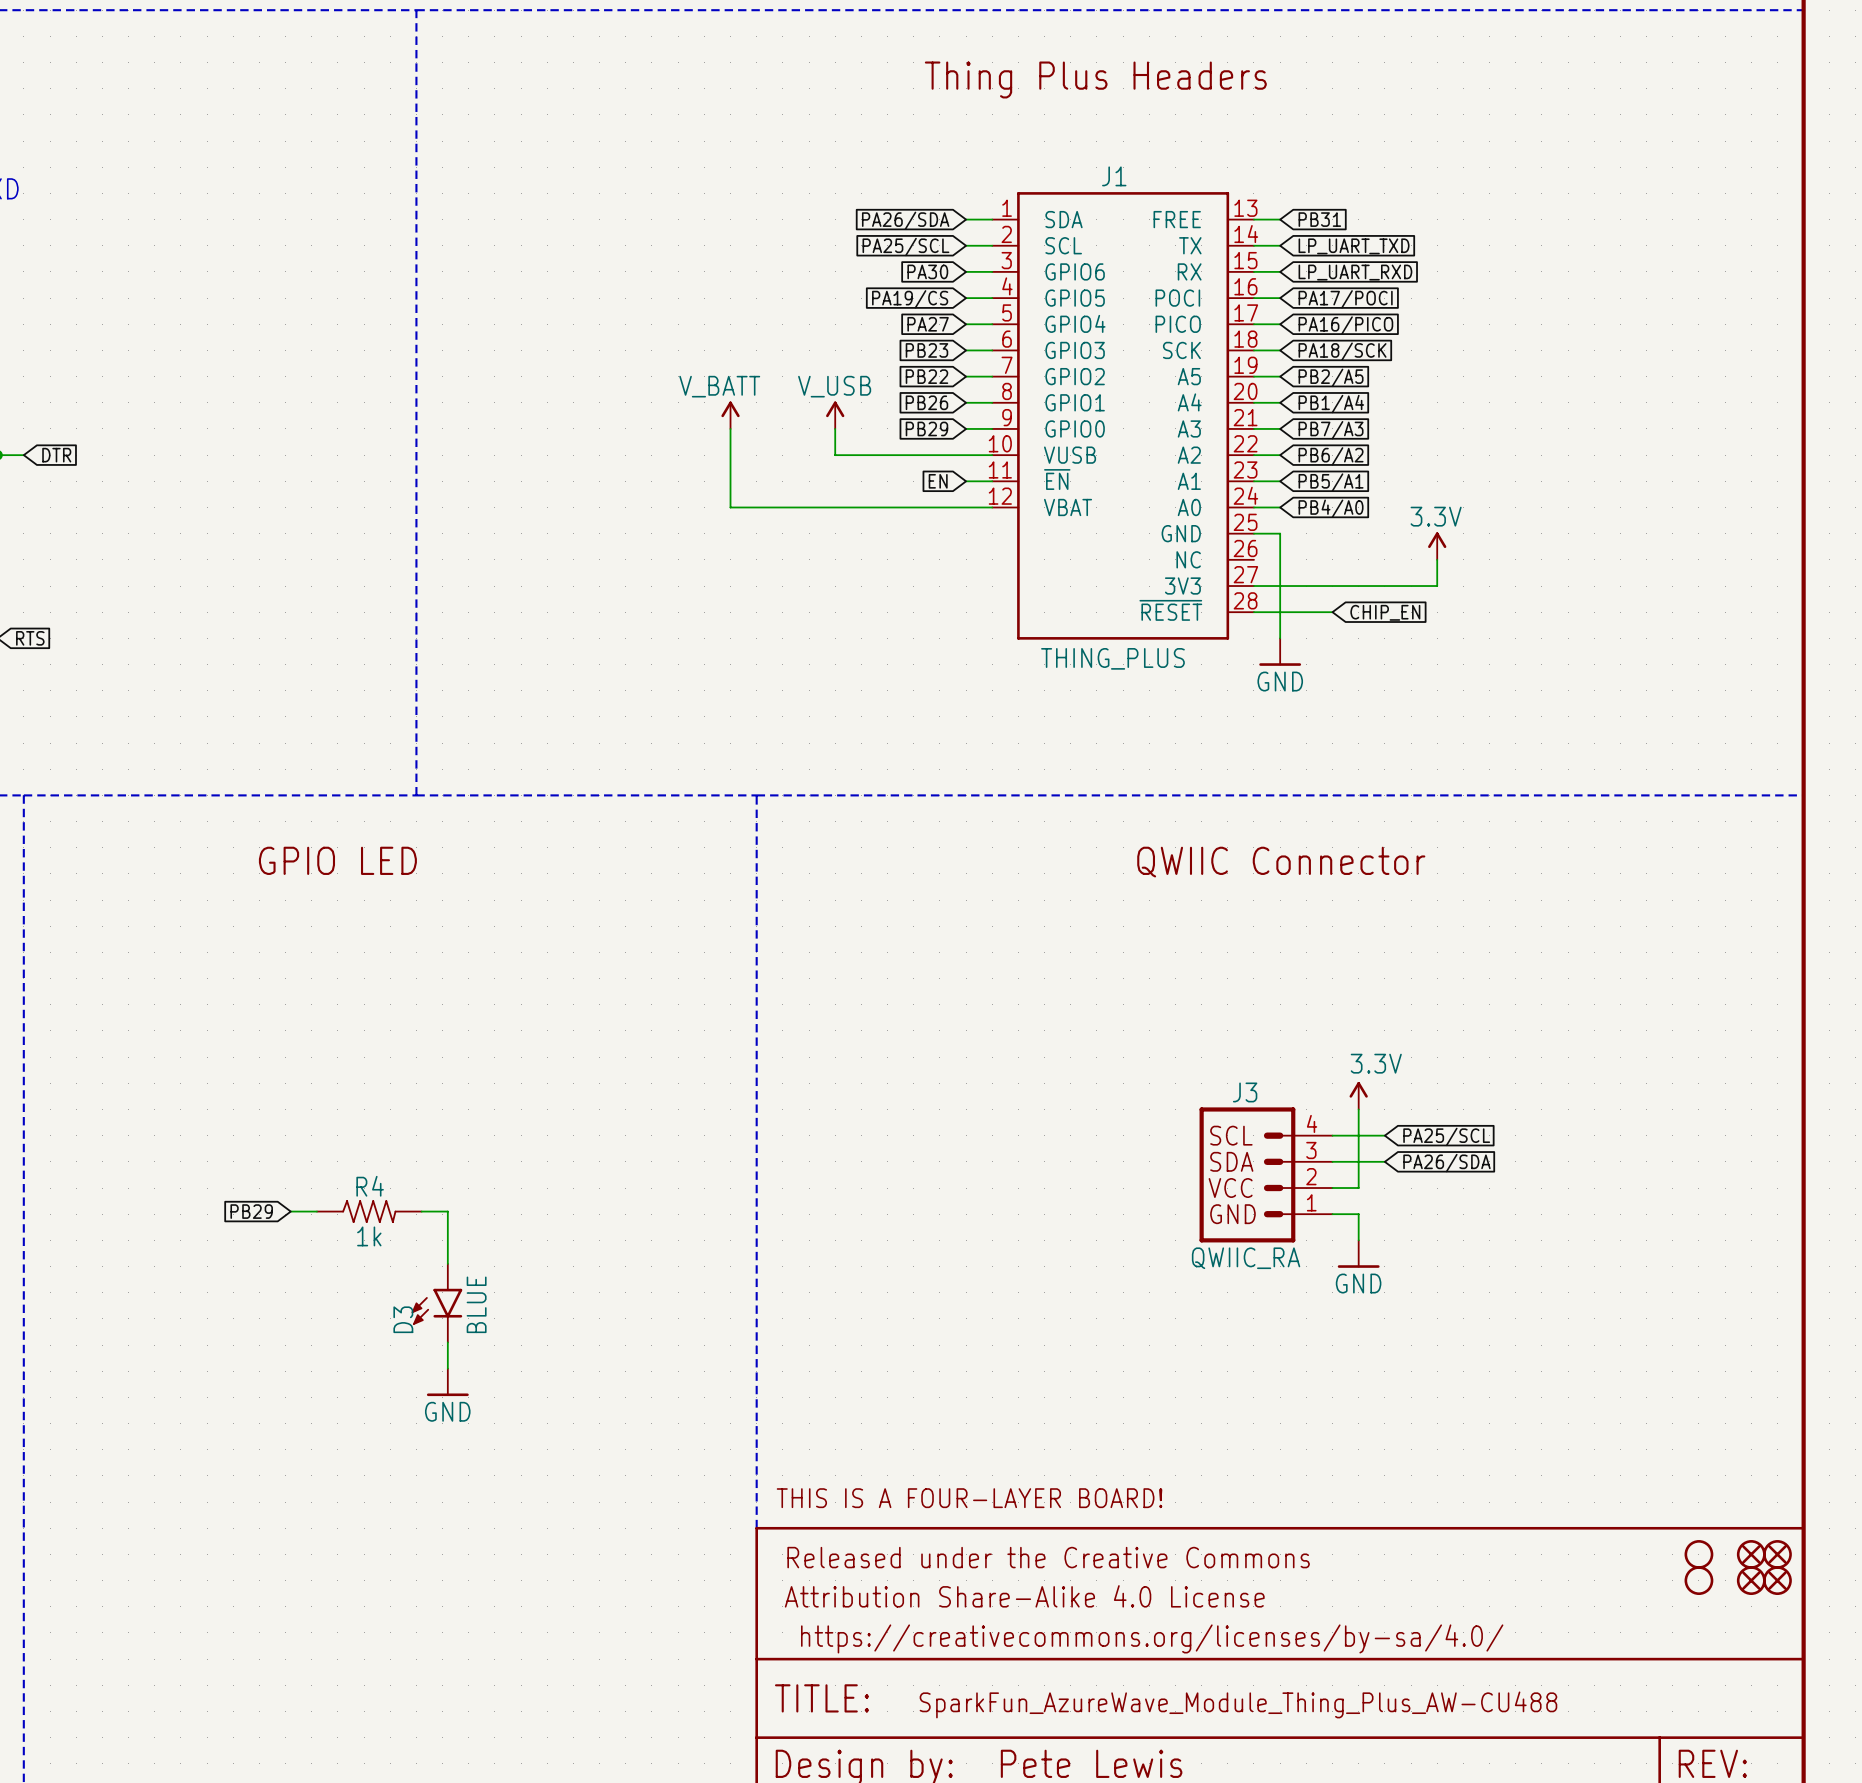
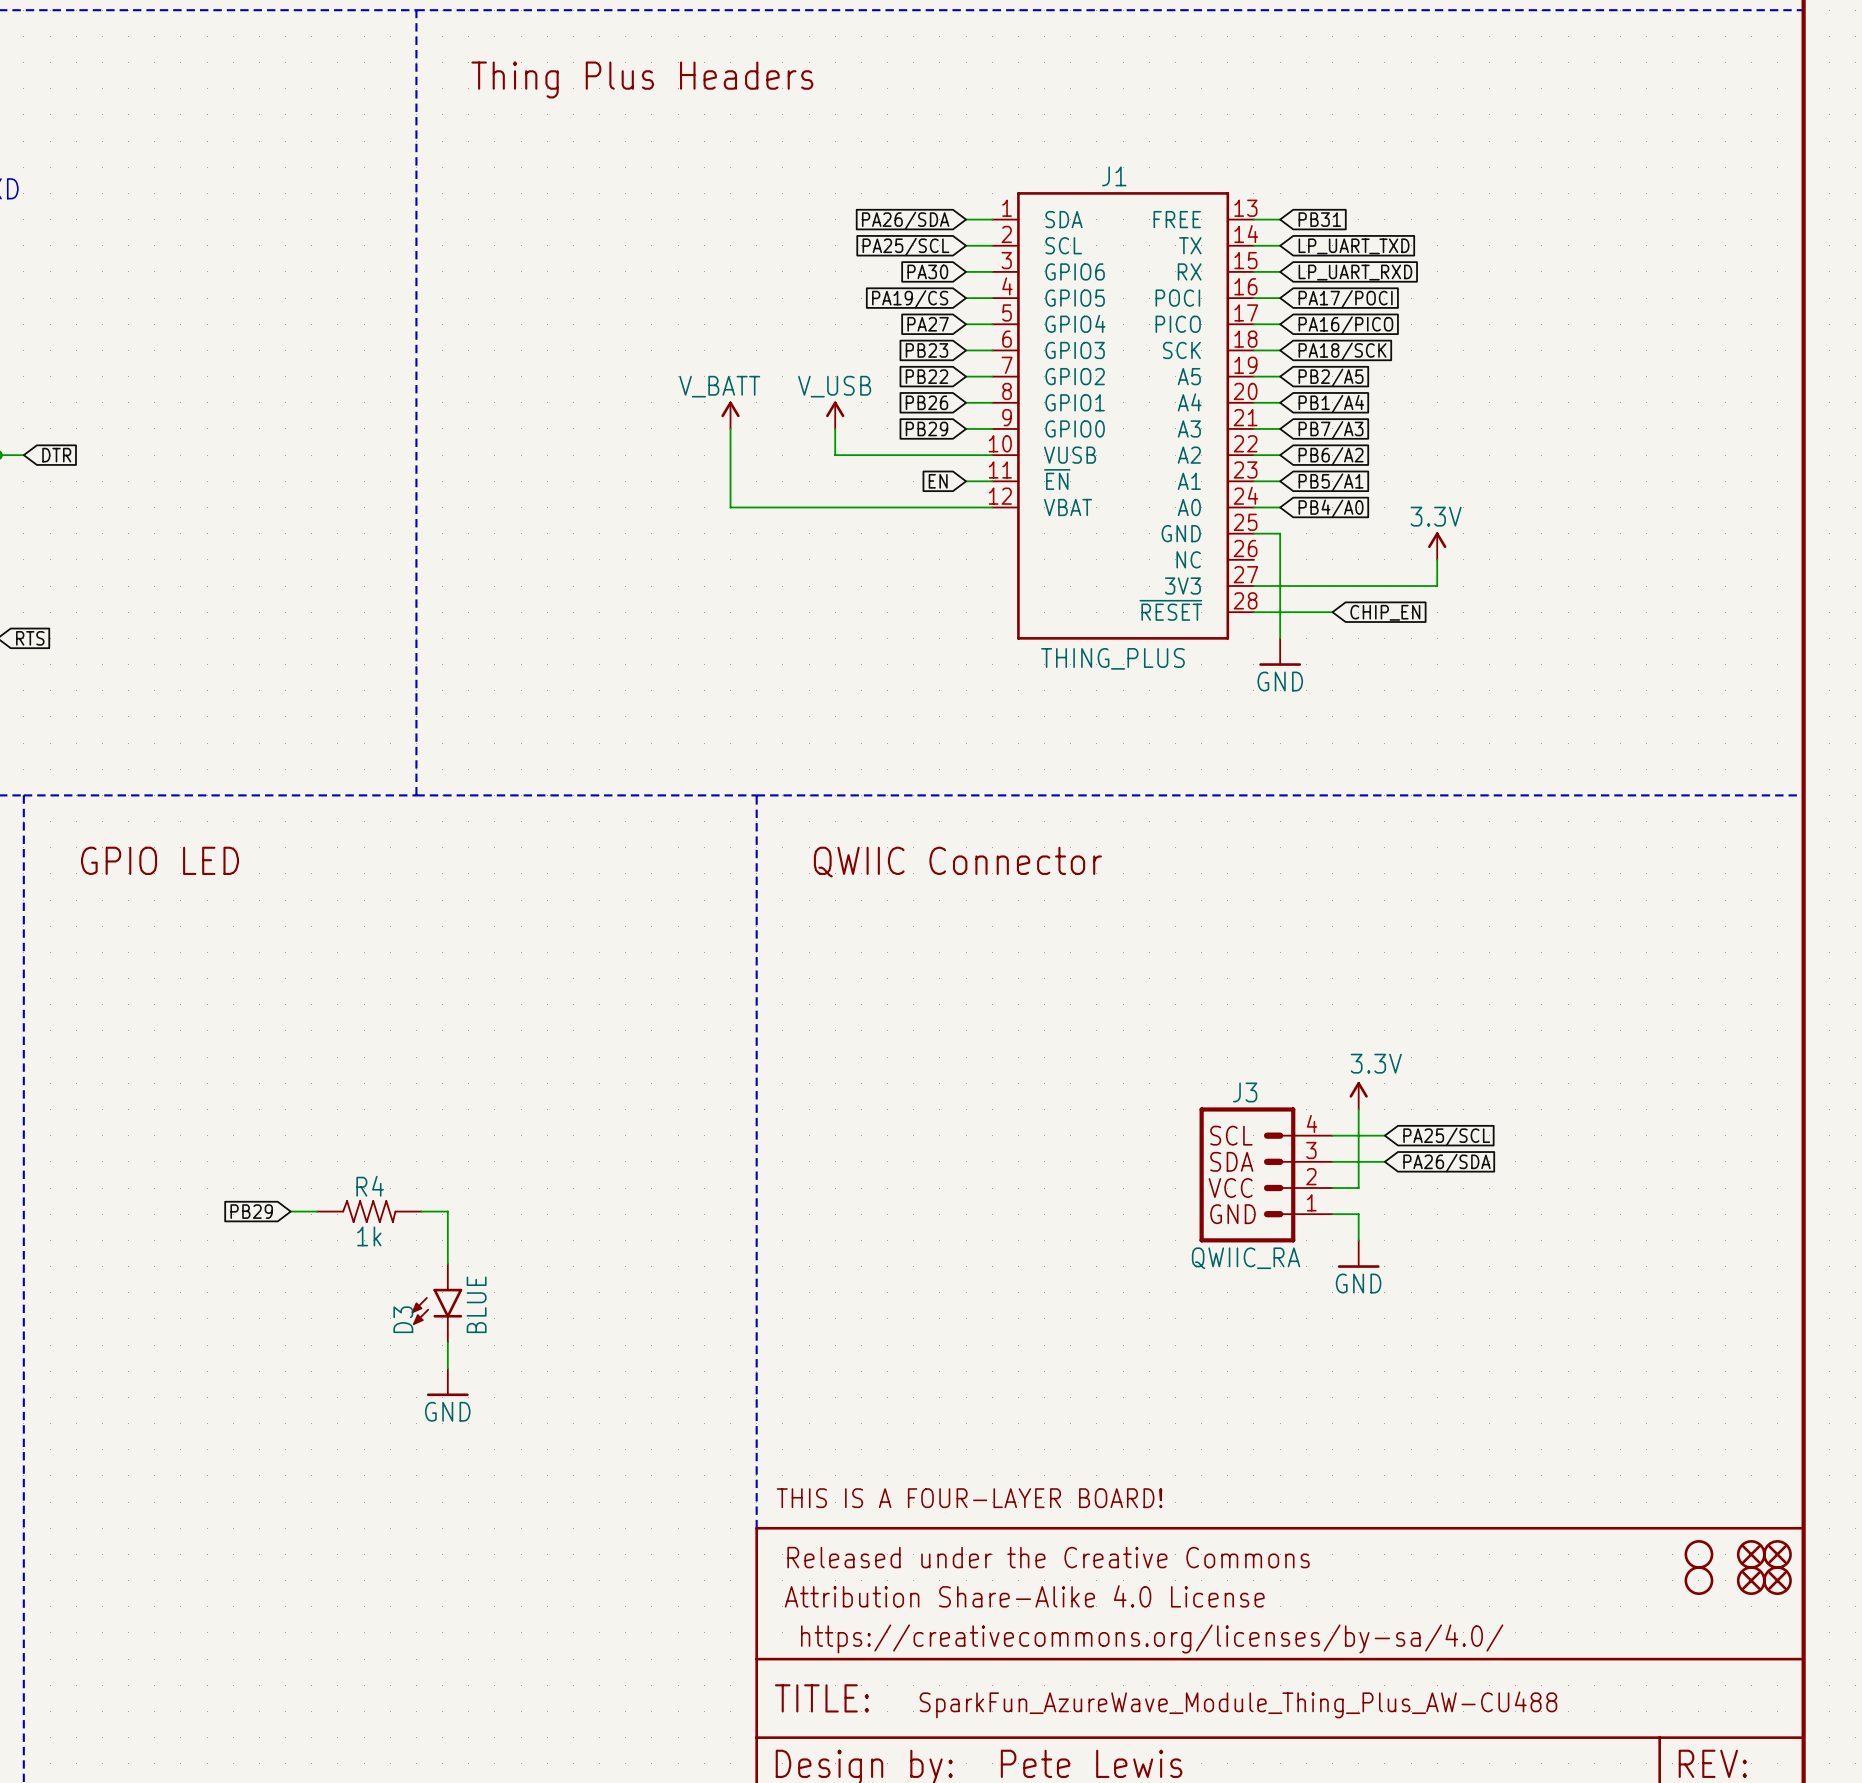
text: none -> Thing Plus Headers (642, 79)
text: Thing Plus Headers (1095, 79) -> none
text: none -> GPIO LED (159, 860)
text: GPIO LED (337, 860) -> none
text: none -> QWIIC Connector (957, 862)
text: QWIIC Connector (1281, 862) -> none

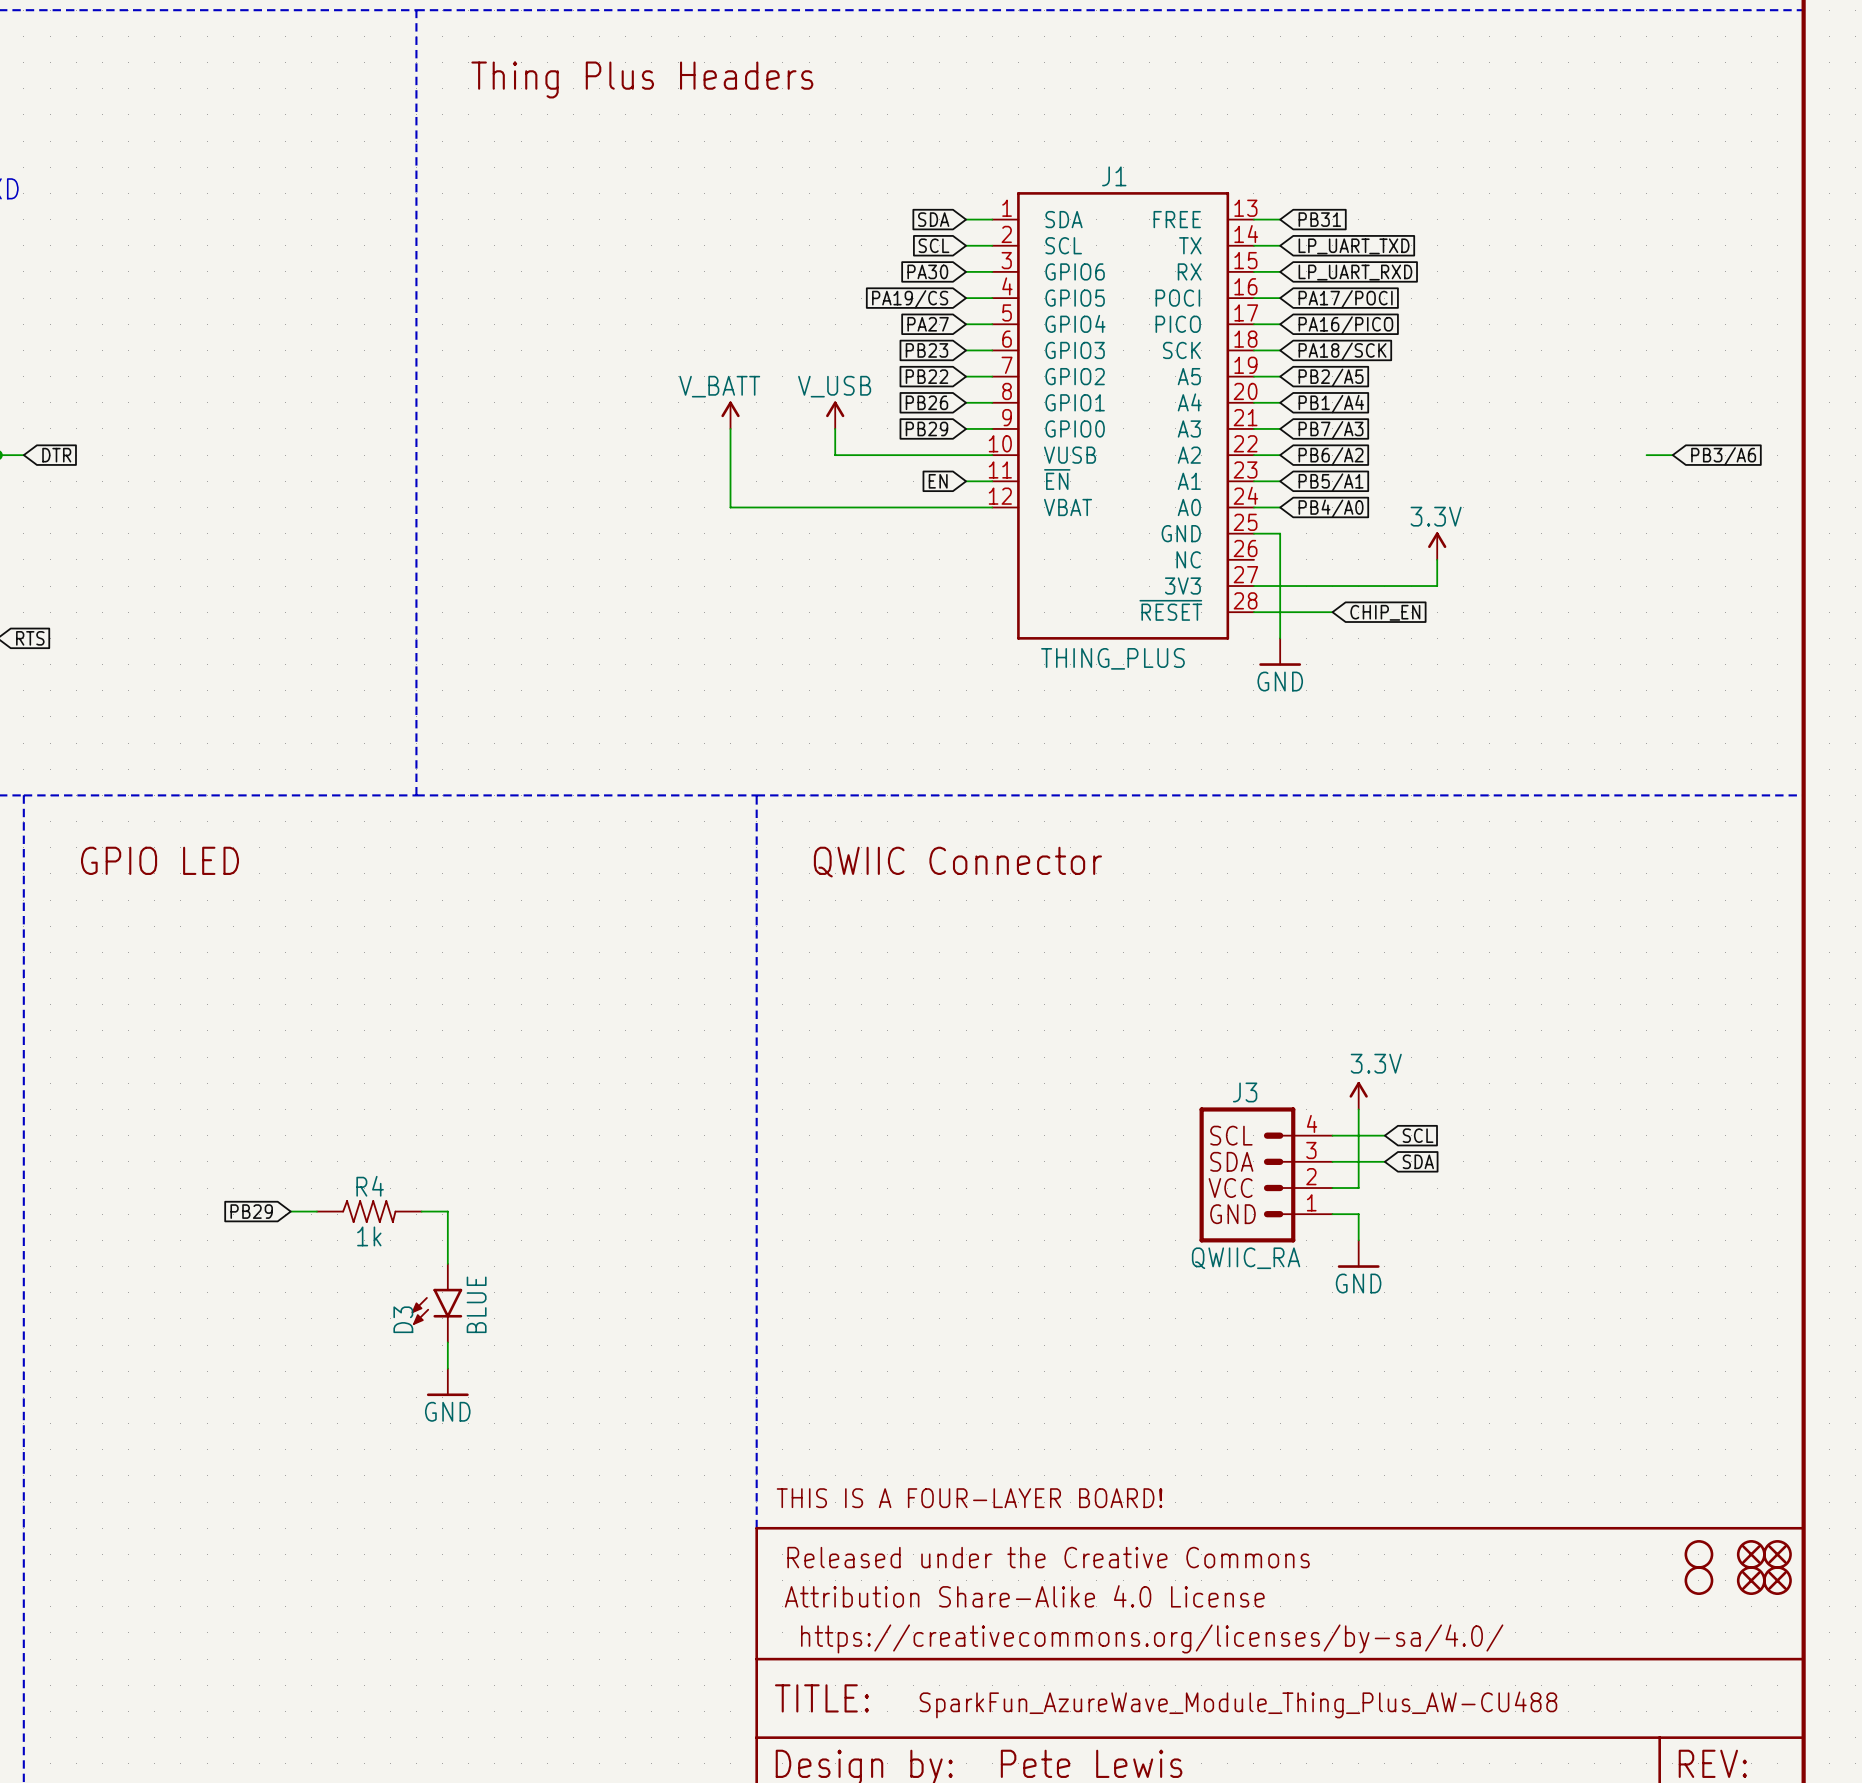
global label: PA26/SDA (905, 220) -> SDA (933, 219)
global label: PA25/SCL (905, 247) -> SCL (933, 245)
wire: none -> (1646, 455) (1672, 455)
global label: none -> PB3/A6 (1723, 456)
global label: PA25/SCL (1446, 1136) -> SCL (1418, 1135)
global label: PA26/SDA (1446, 1163) -> SDA (1418, 1161)

